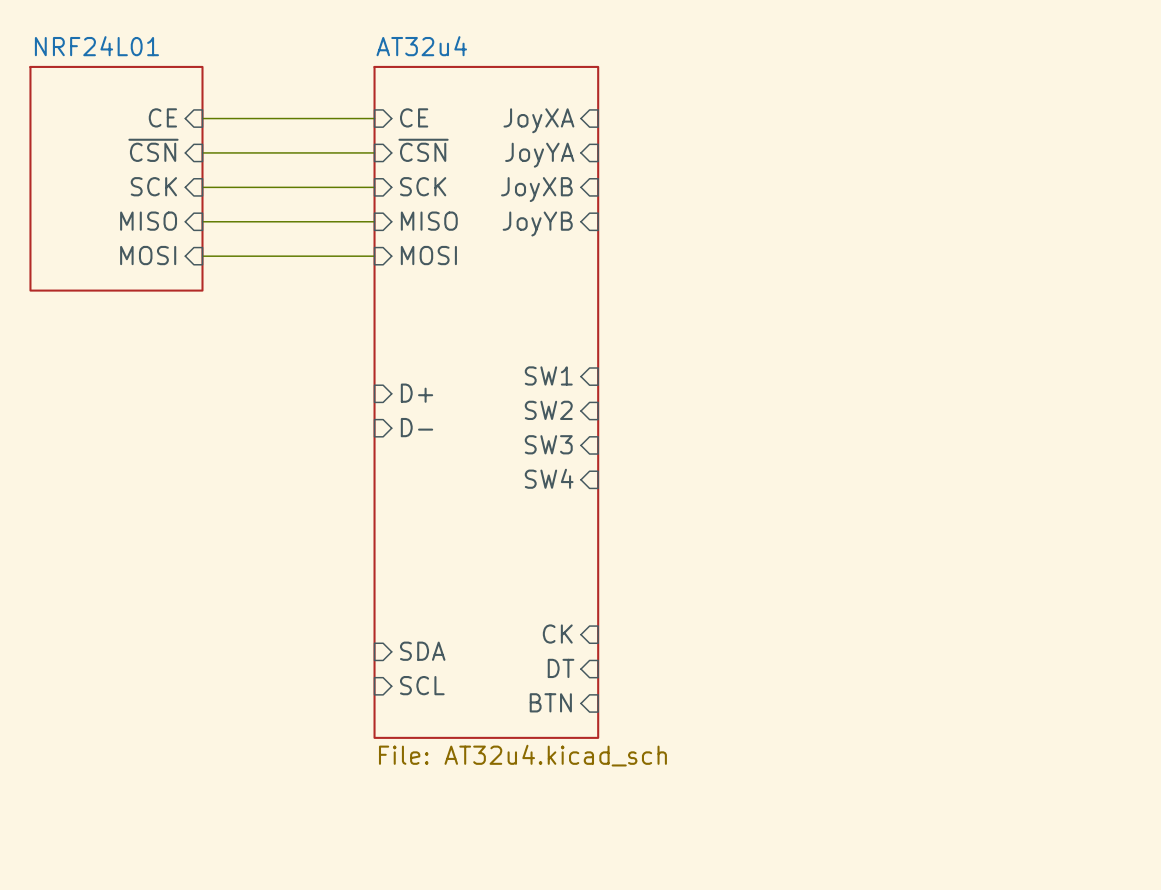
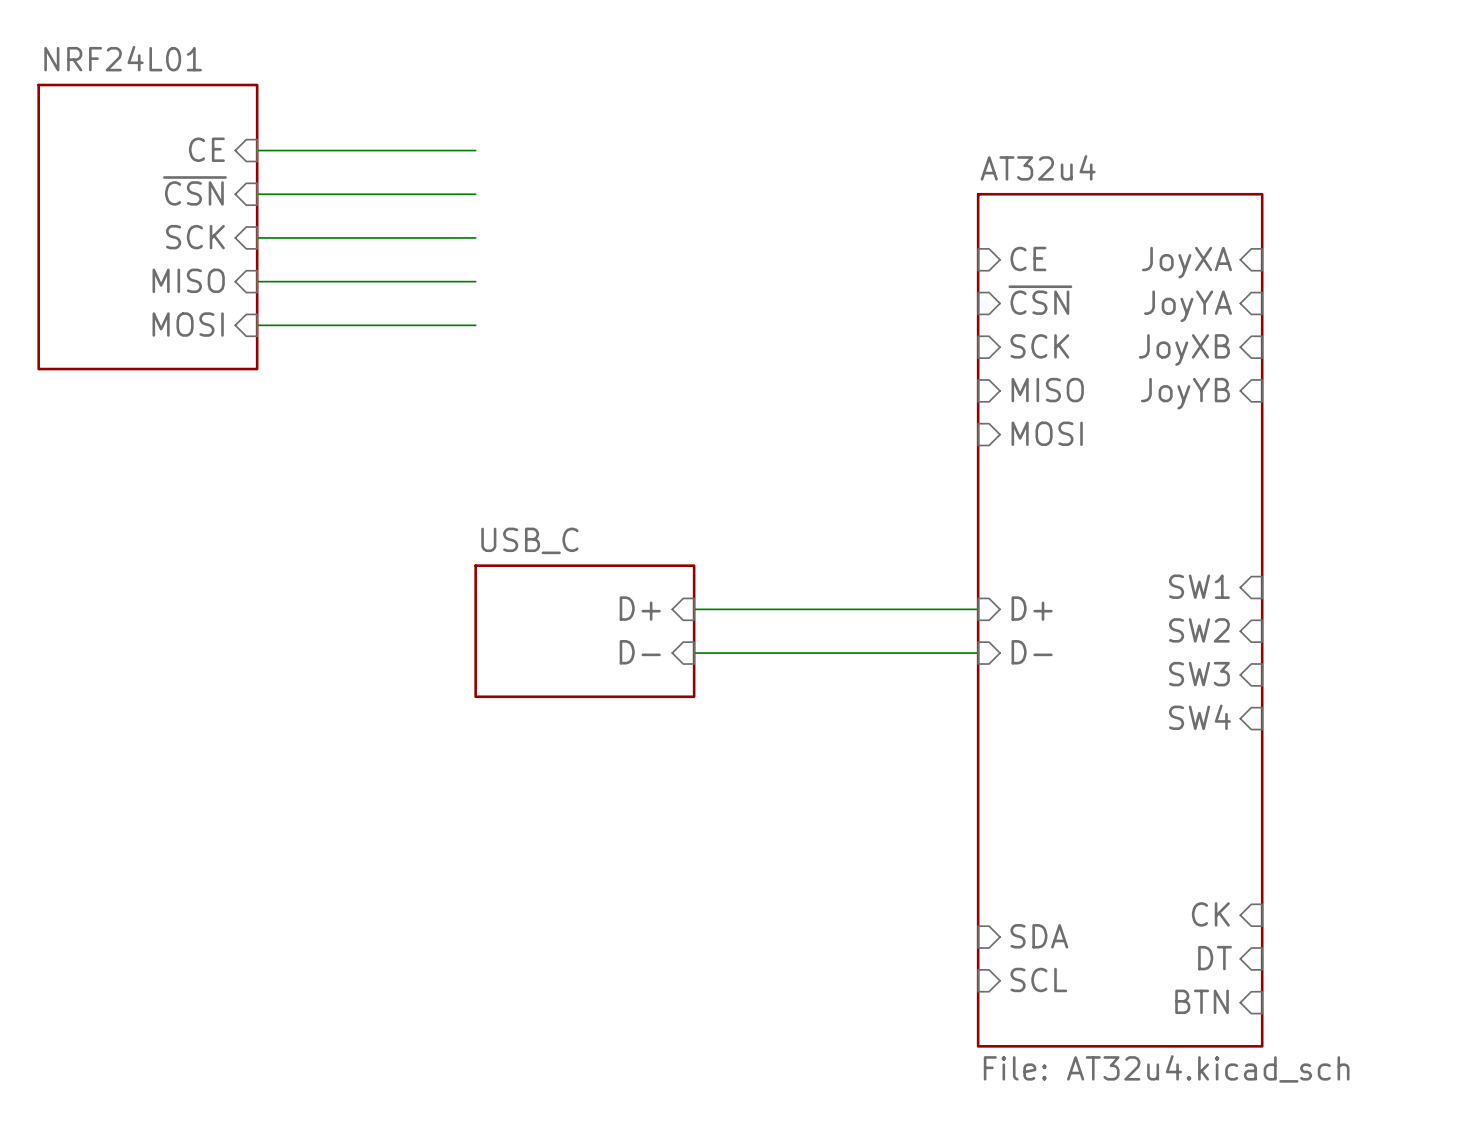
sheet pin: CE (414, 117) -> none
sheet pin: JoyXA (538, 120) -> none
sheet pin: ~{CSN} (423, 150) -> none
sheet pin: JoyYA (539, 155) -> none
sheet pin: SCK (423, 186) -> none
sheet pin: JoyXB (536, 189) -> none
sheet pin: none -> CE (1028, 258)
sheet pin: none -> JoyXA (1186, 262)
sheet pin: MISO (429, 221) -> none
sheet pin: JoyYB (537, 223) -> none
sheet pin: none -> ~{CSN} (1040, 300)
sheet pin: none -> JoyYA (1187, 306)
sheet pin: MOSI (428, 255) -> none
sheet pin: none -> SCK (1039, 346)
sheet pin: none -> JoyXB (1184, 350)
sheet pin: none -> MISO (1047, 390)
sheet pin: none -> JoyYB (1185, 393)
sheet pin: none -> MOSI (1047, 433)
sheet pin: SW1 (548, 375) -> none
sheet pin rotation: 0° (416, 393) -> 180° (640, 608)
sheet pin position: D+ (416, 393) -> D+ (640, 608)
sheet AT32u4 position: (486, 402) -> (1120, 620)
sheet pin: SW2 (548, 410) -> none
sheet pin rotation: 0° (416, 427) -> 180° (640, 652)
sheet pin position: D- (416, 427) -> D- (640, 652)
sheet pin: SW3 (548, 444) -> none
sheet pin: none -> SW1 (1199, 586)
sheet pin: SW4 (549, 478) -> none
wire: none -> (694, 609) (978, 609)
sheet pin: none -> D+ (1032, 608)
sheet pin: none -> SW2 (1199, 630)
sheet USB_C: none -> (584, 631)
sheet pin: none -> D- (1032, 652)
wire: none -> (694, 653) (978, 653)
sheet pin: none -> SW3 (1199, 674)
sheet pin: none -> SW4 (1199, 717)
sheet pin: CK (557, 634) -> none
sheet pin: SDA (422, 651) -> none
sheet pin: DT (561, 668) -> none
sheet pin: SCL (422, 685) -> none
sheet pin: BTN (550, 702) -> none
sheet pin: none -> CK (1210, 914)
sheet pin: none -> SDA (1039, 936)
sheet pin: none -> DT (1215, 958)
sheet pin: none -> SCL (1038, 979)
sheet pin: none -> BTN (1202, 1001)

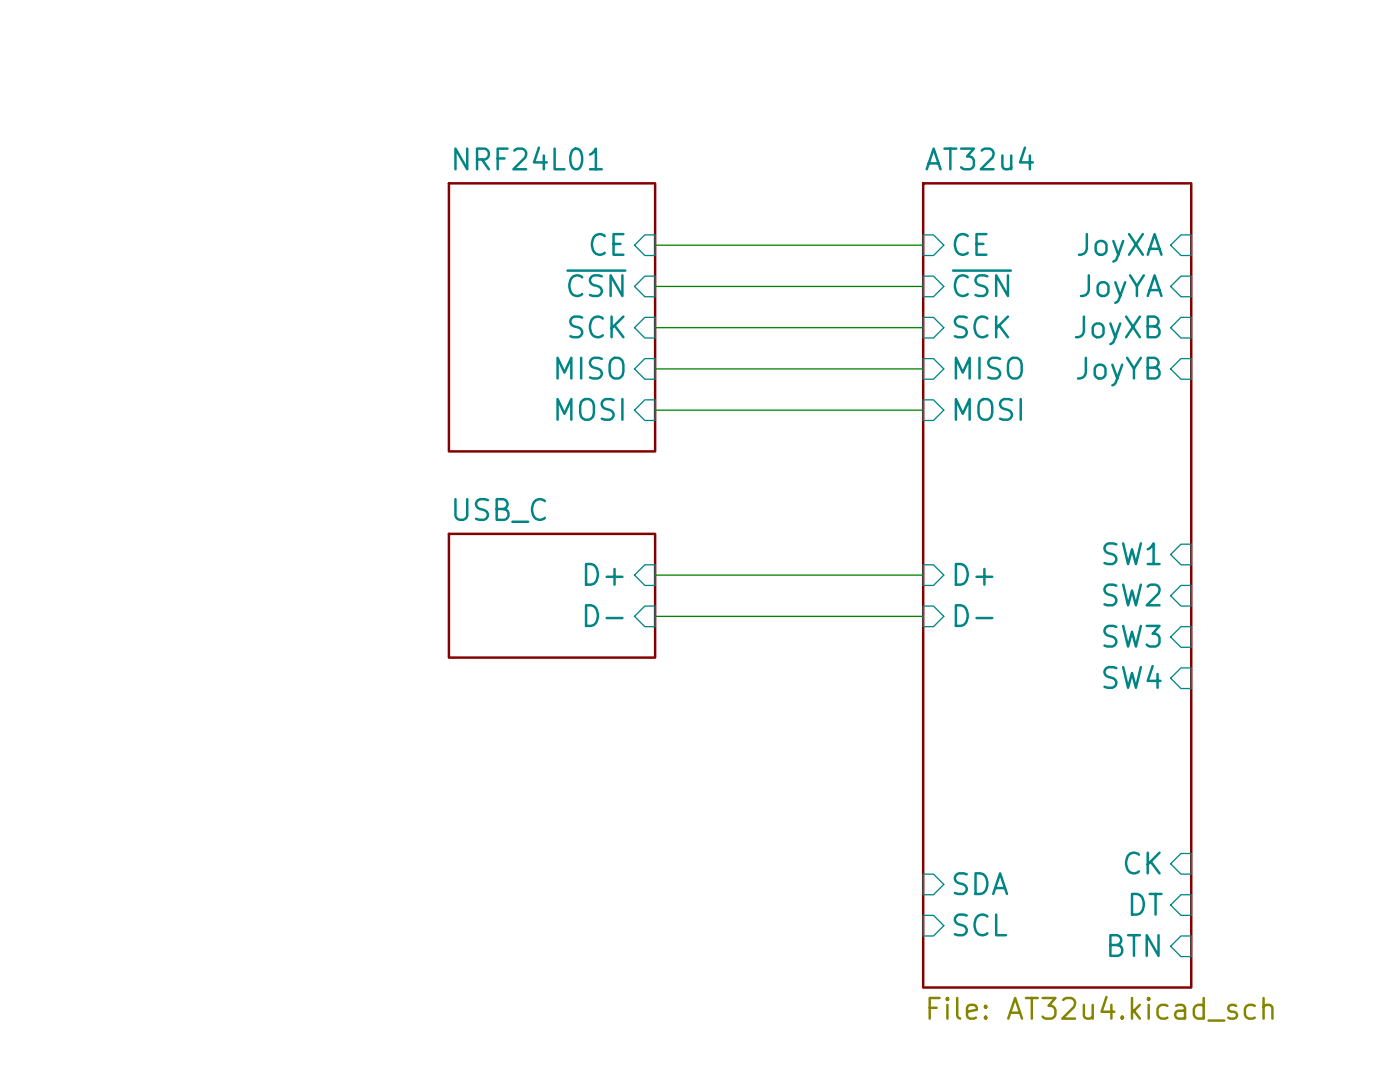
sheet pin: CE (206, 149) -> none
wire: (257, 150) (475, 150) -> none
sheet pin: ~{CSN} (194, 190) -> none
wire: (257, 194) (475, 194) -> none
sheet NRF24L01 position: (147, 227) -> (552, 317)
sheet pin: SCK (195, 237) -> none
wire: (257, 237) (475, 237) -> none
sheet pin: none -> CE (607, 244)
wire: none -> (655, 245) (923, 245)
sheet pin: MISO (188, 280) -> none
wire: (257, 281) (475, 281) -> none
sheet pin: none -> ~{CSN} (596, 283)
wire: none -> (655, 286) (923, 286)
sheet pin: MOSI (188, 324) -> none
wire: (257, 325) (475, 325) -> none
sheet pin: none -> SCK (596, 326)
wire: none -> (655, 327) (923, 327)
sheet pin: none -> MISO (590, 368)
wire: none -> (655, 368) (923, 368)
sheet pin: none -> MOSI (589, 409)
wire: none -> (655, 410) (923, 410)

